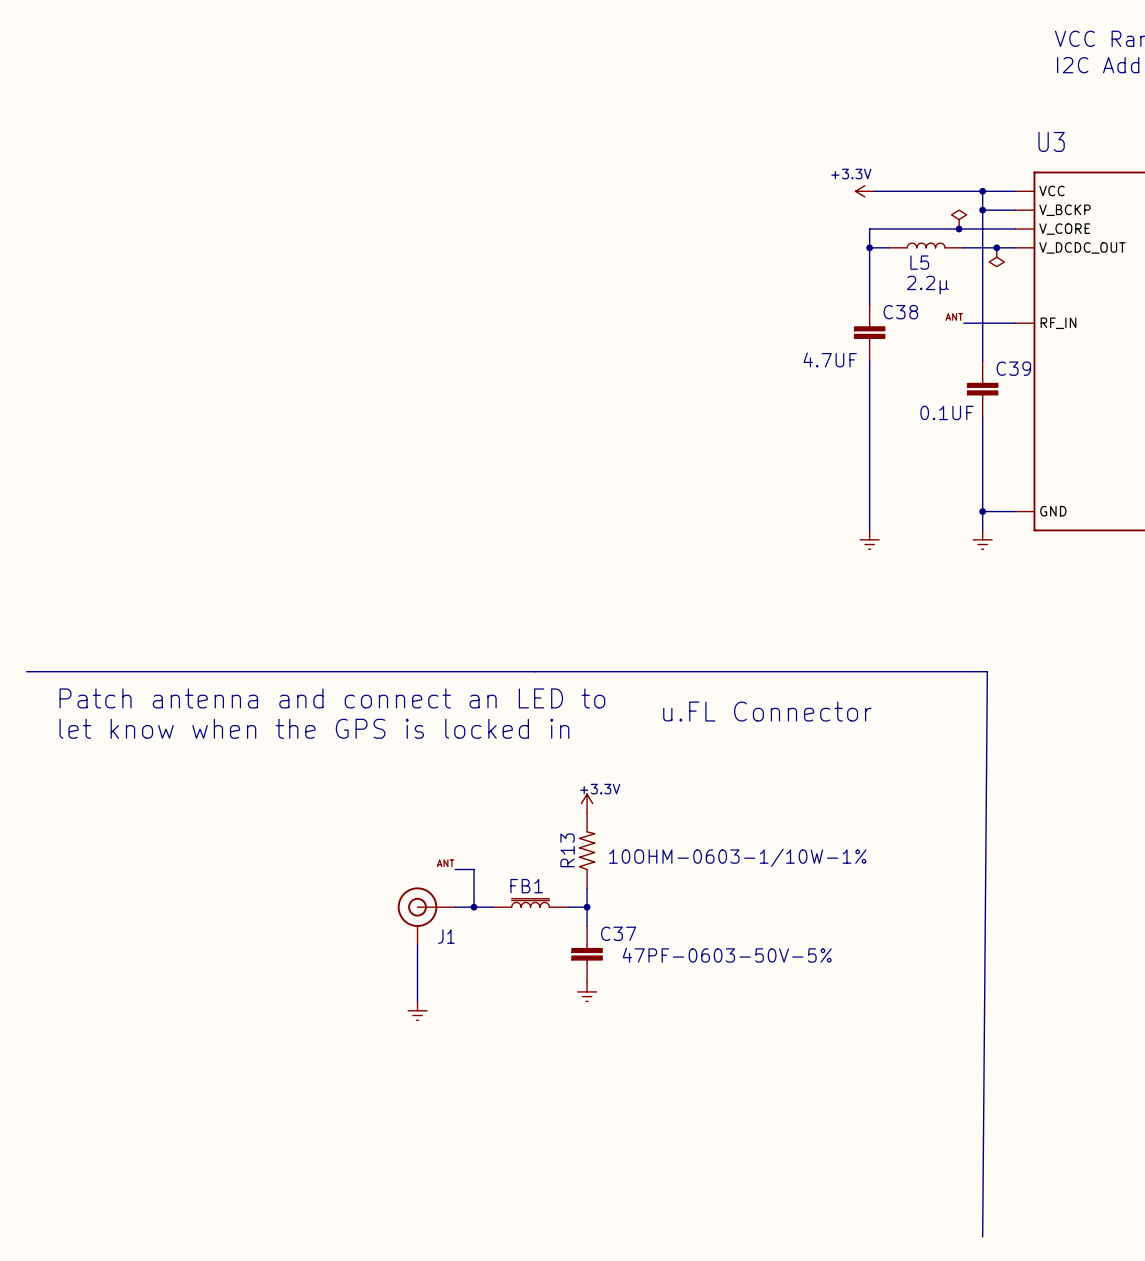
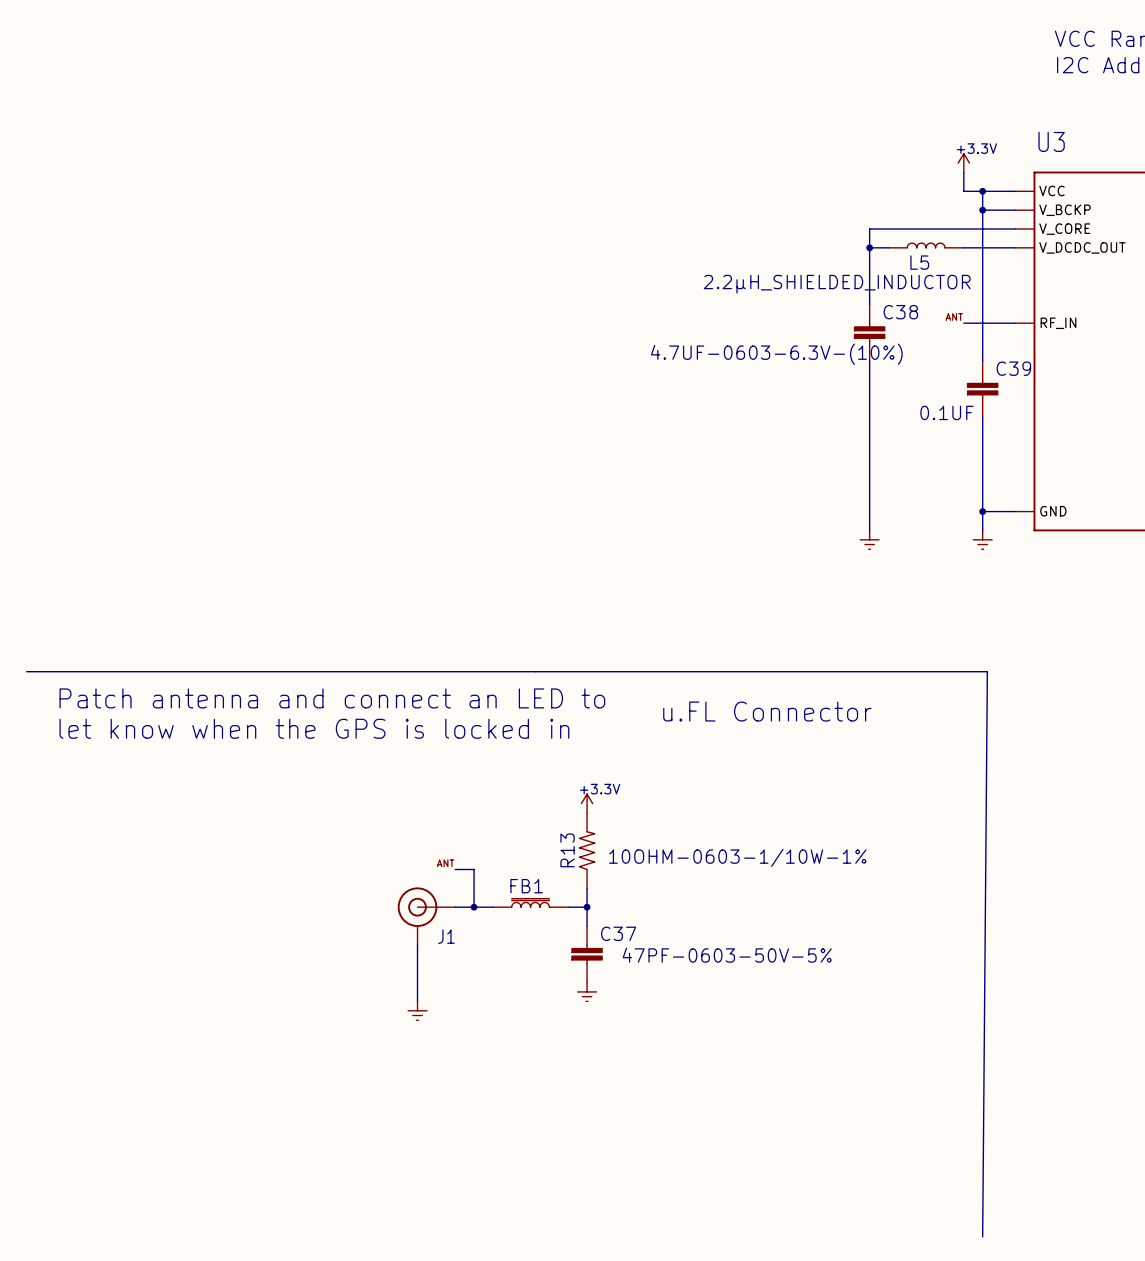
power symbol rotation: 0° (864, 191) -> 90° clockwise (963, 163)
power symbol position: +3.3V (864, 191) -> +3.3V (963, 163)
wire: (874, 191) (963, 191) -> (963, 172) (963, 191)
power symbol: (959, 219) -> none
junction: (959, 229) -> none
junction: (996, 247) -> none
power symbol: (996, 257) -> none
L5 value: 2.2μ (927, 285) -> 2.2μH_SHIELDED_INDUCTOR (837, 284)
C38 value: 4.7UF (830, 359) -> 4.7UF-0603-6.3V-(10%) (776, 354)

